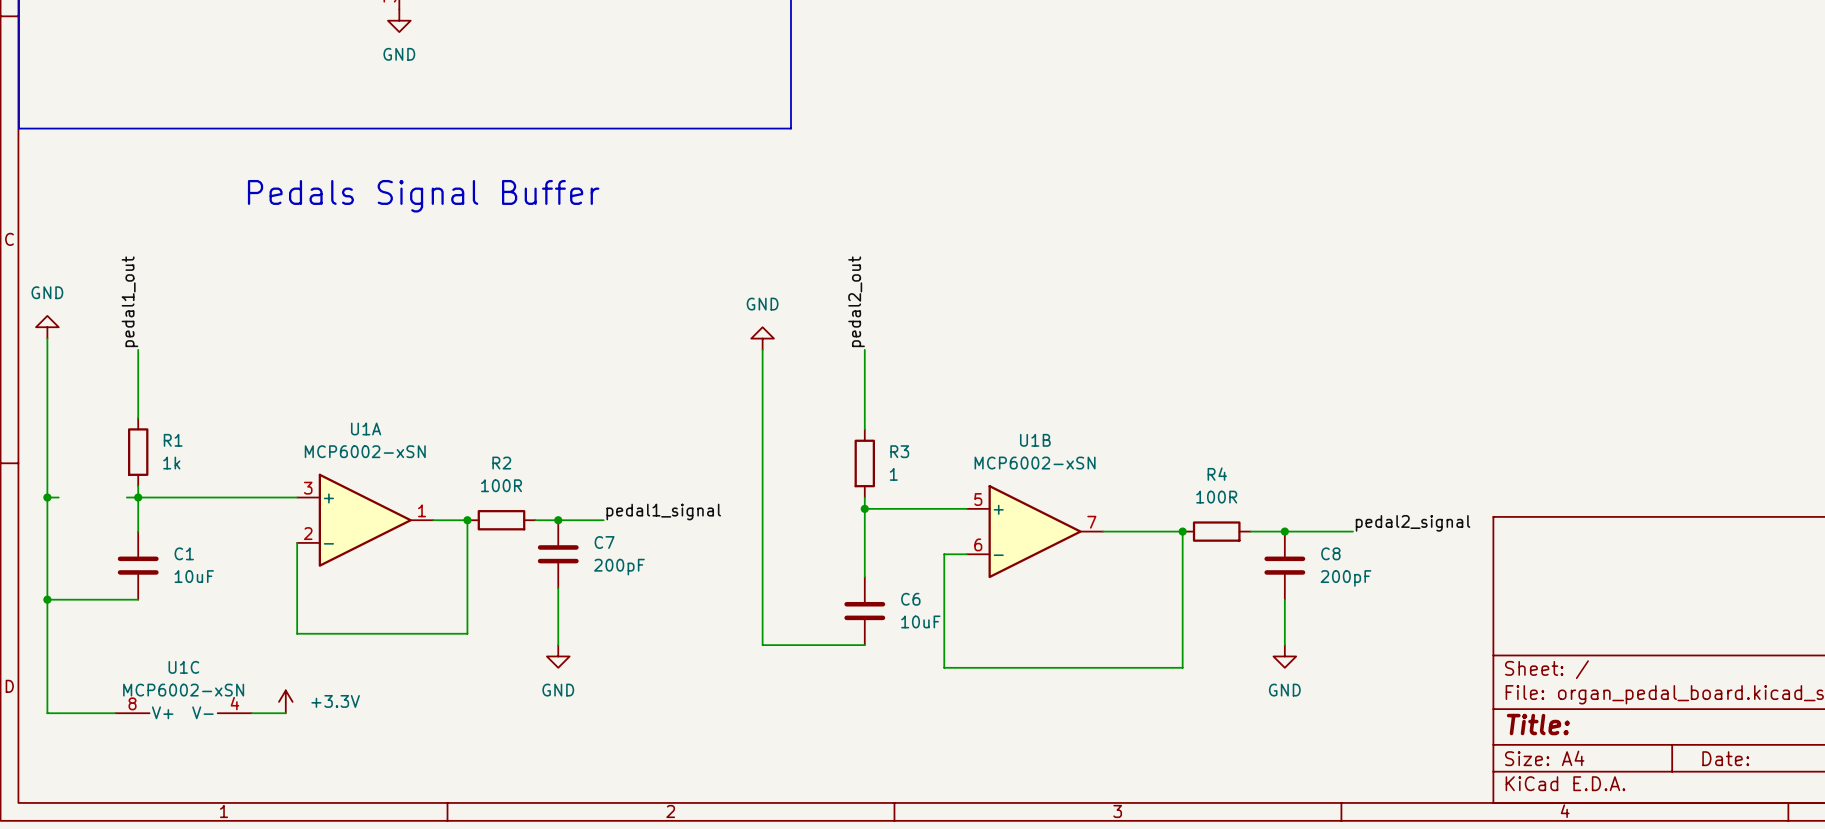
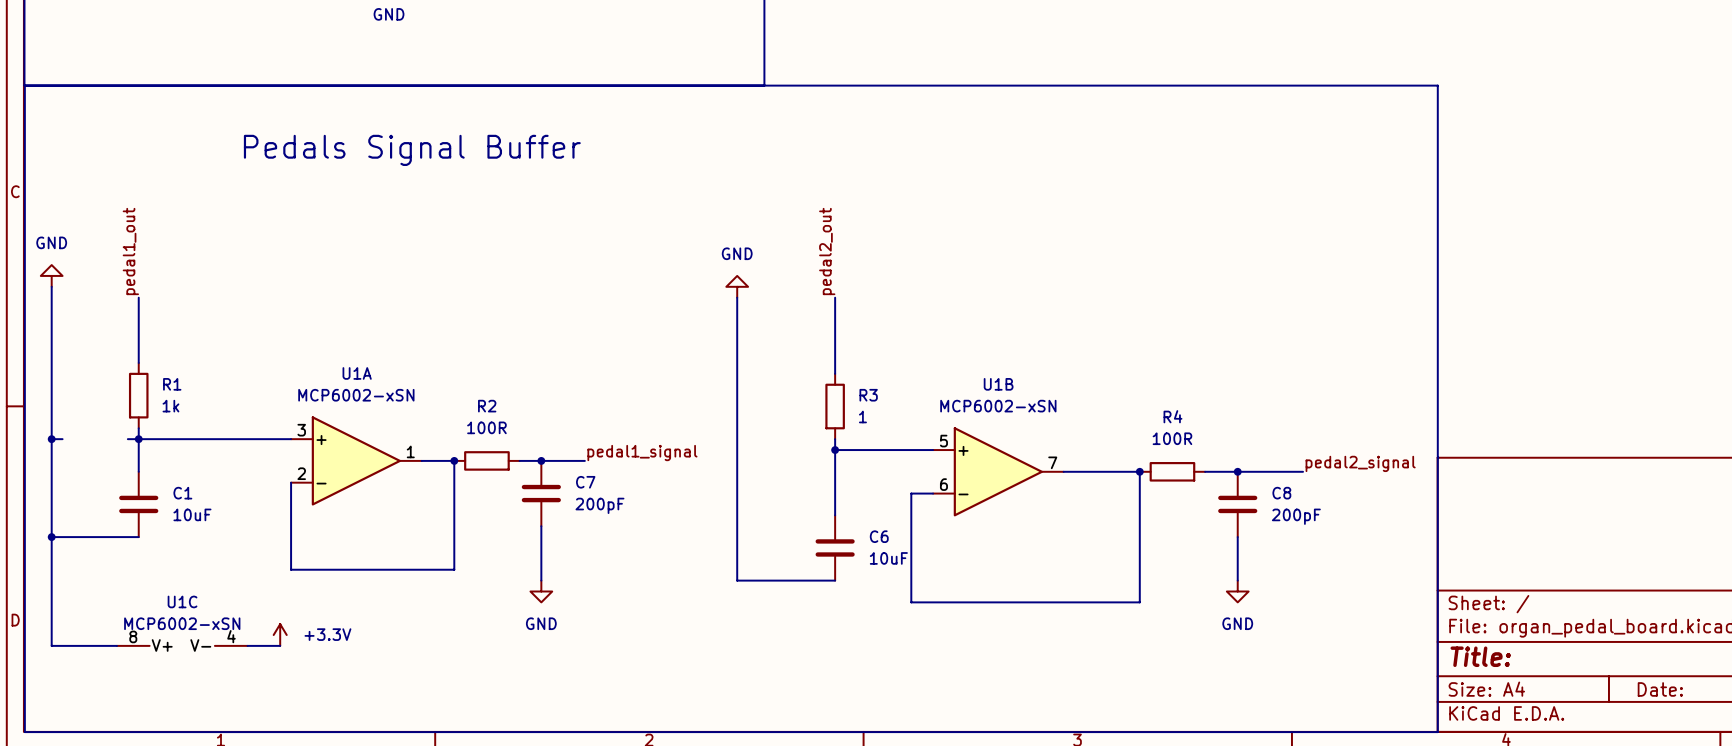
line: none -> (24, 85) (1437, 85) (1437, 732) (24, 732) (24, 85)

